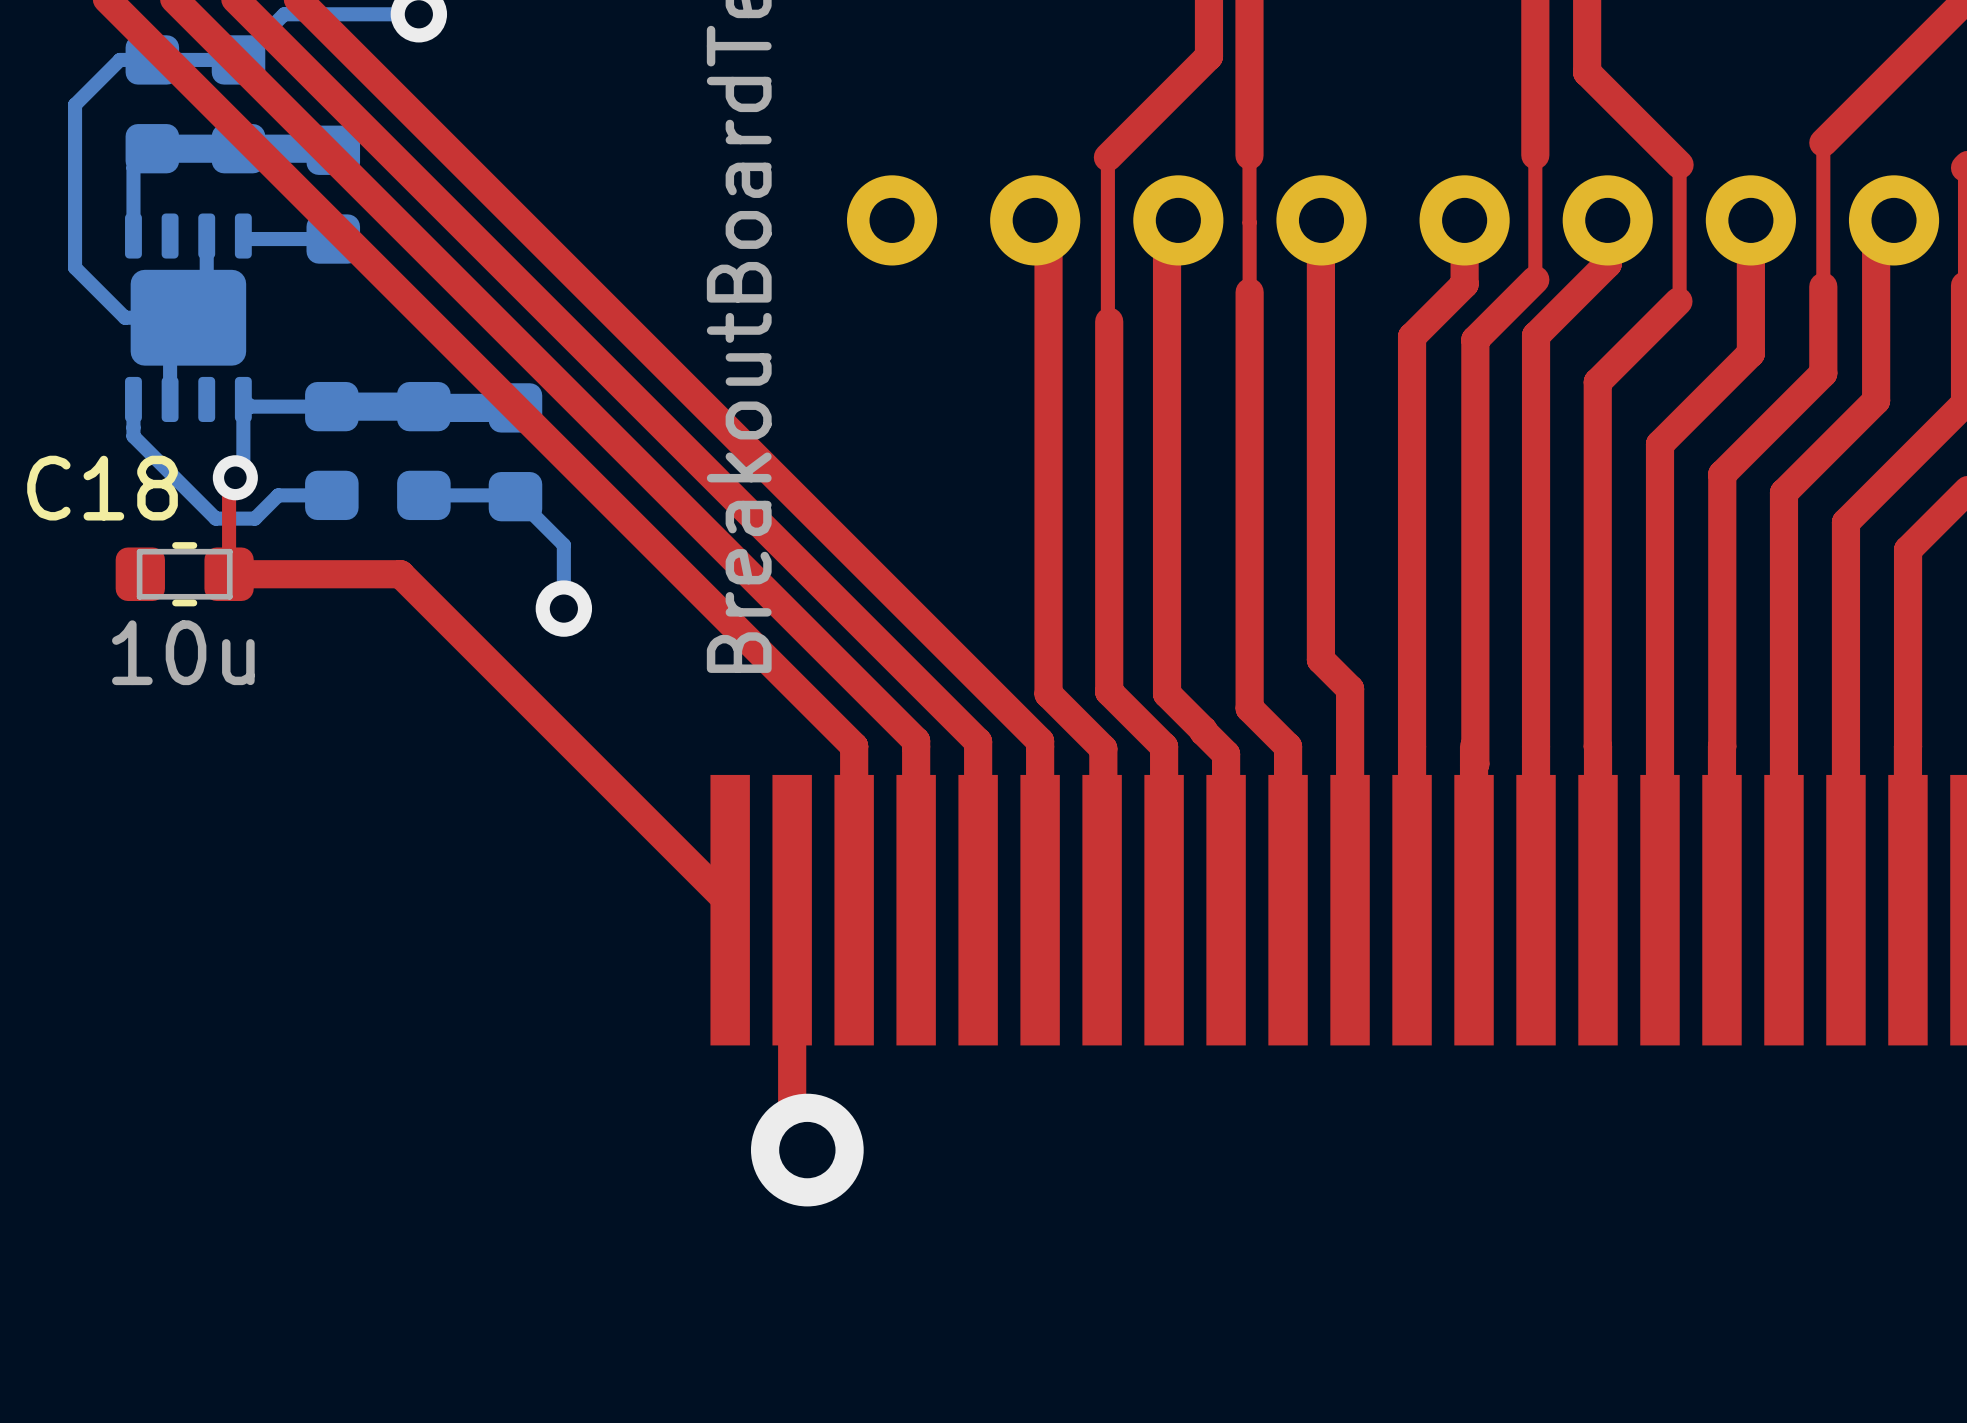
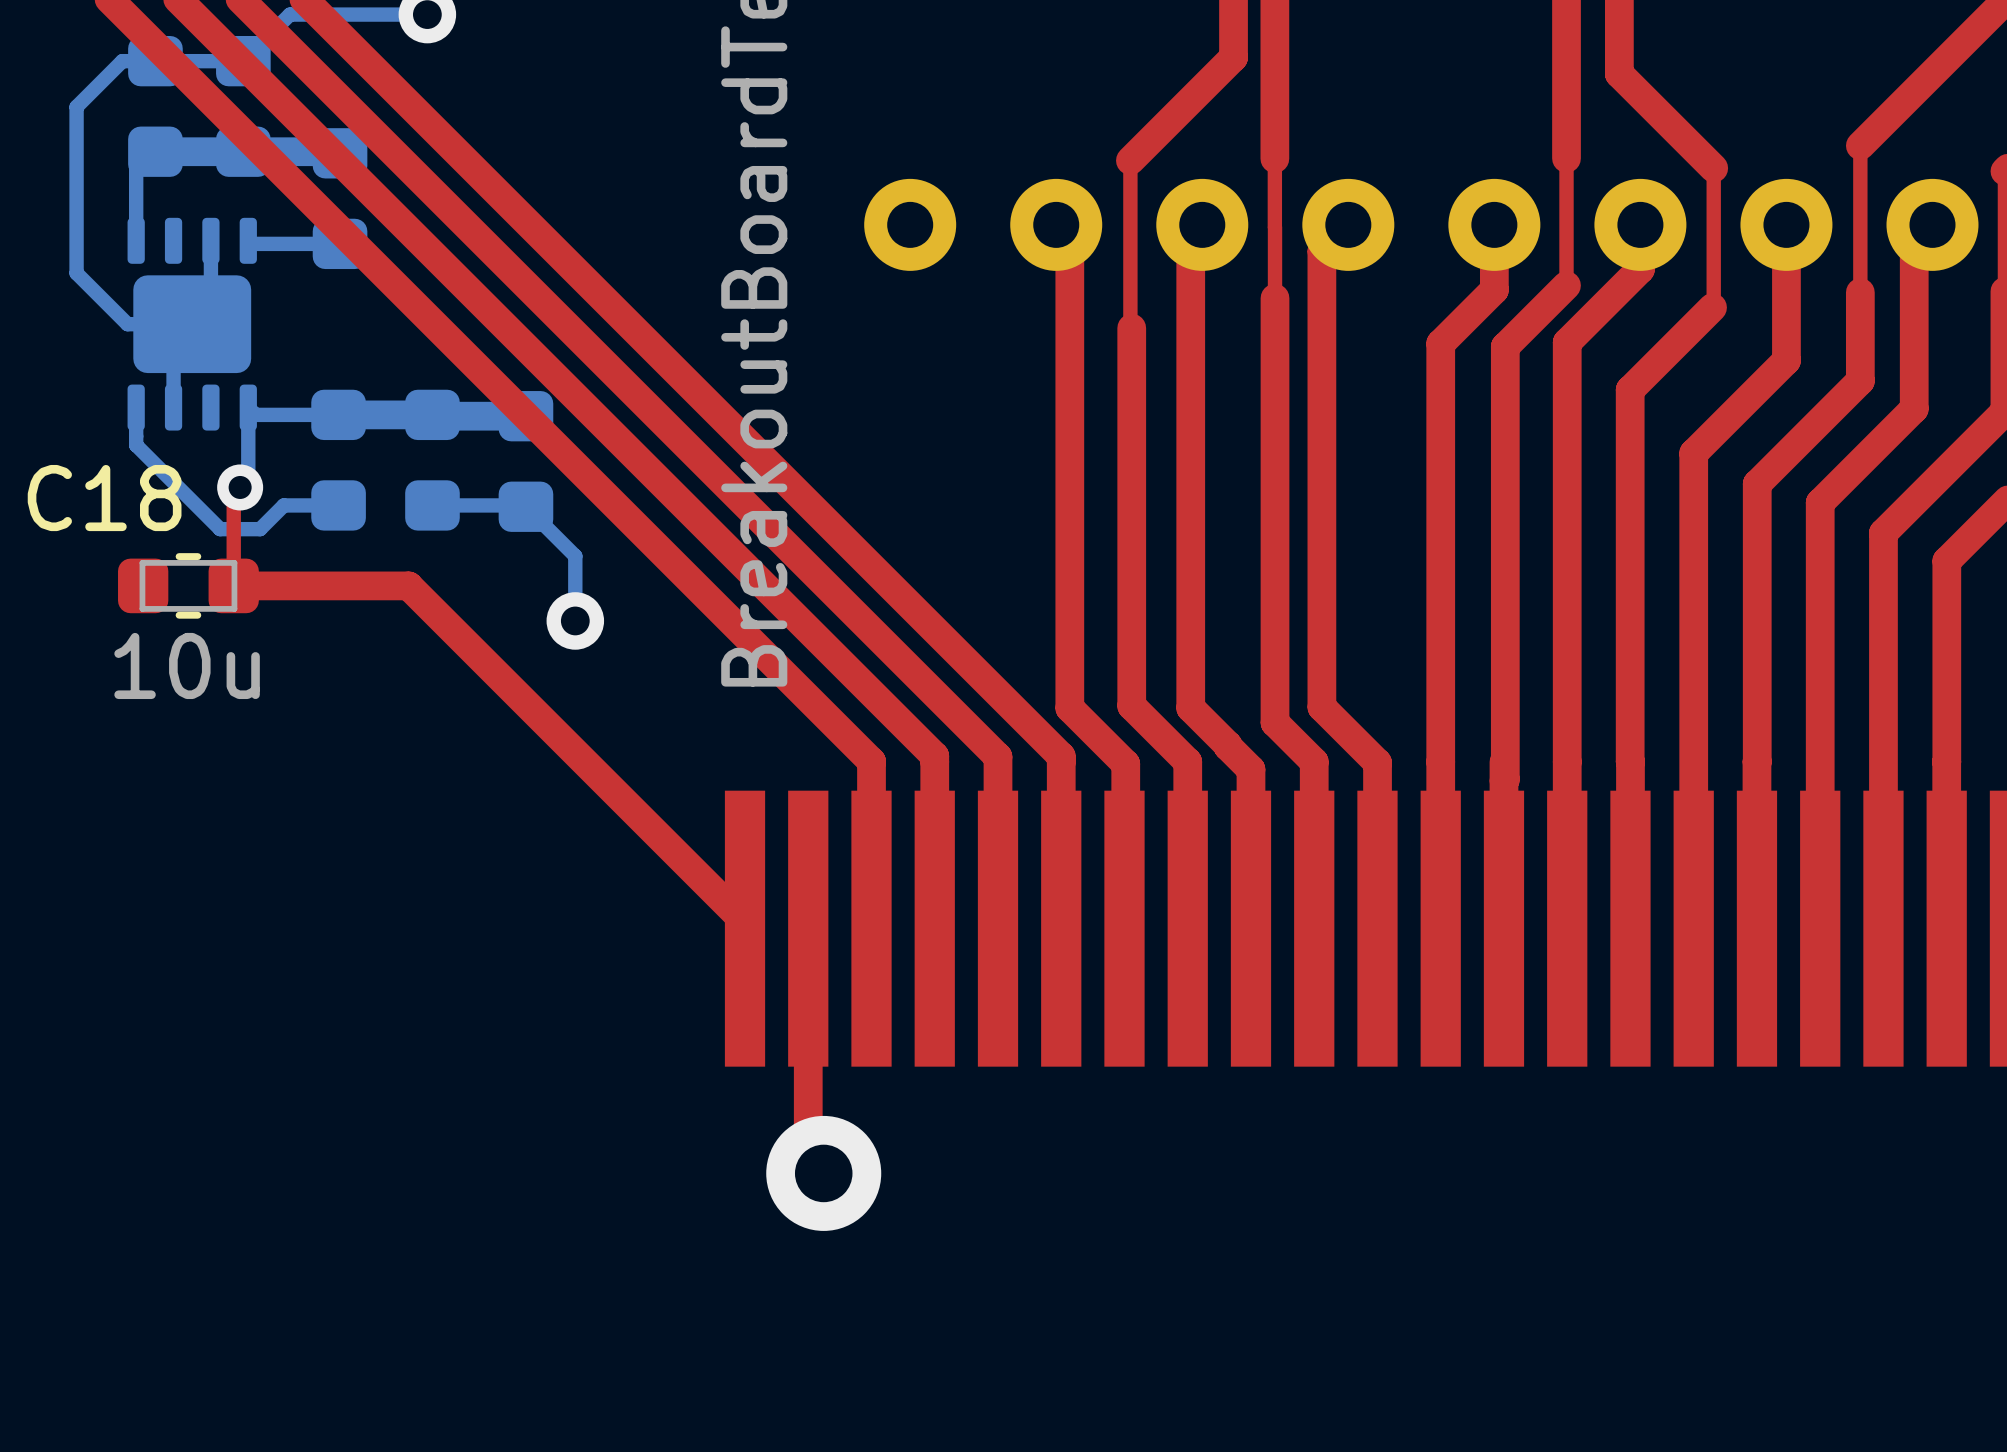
top track: (1320, 220) (1320, 659) (1350, 689) (1350, 747) -> (1347, 225) (1321, 251) (1321, 707) (1377, 762)

